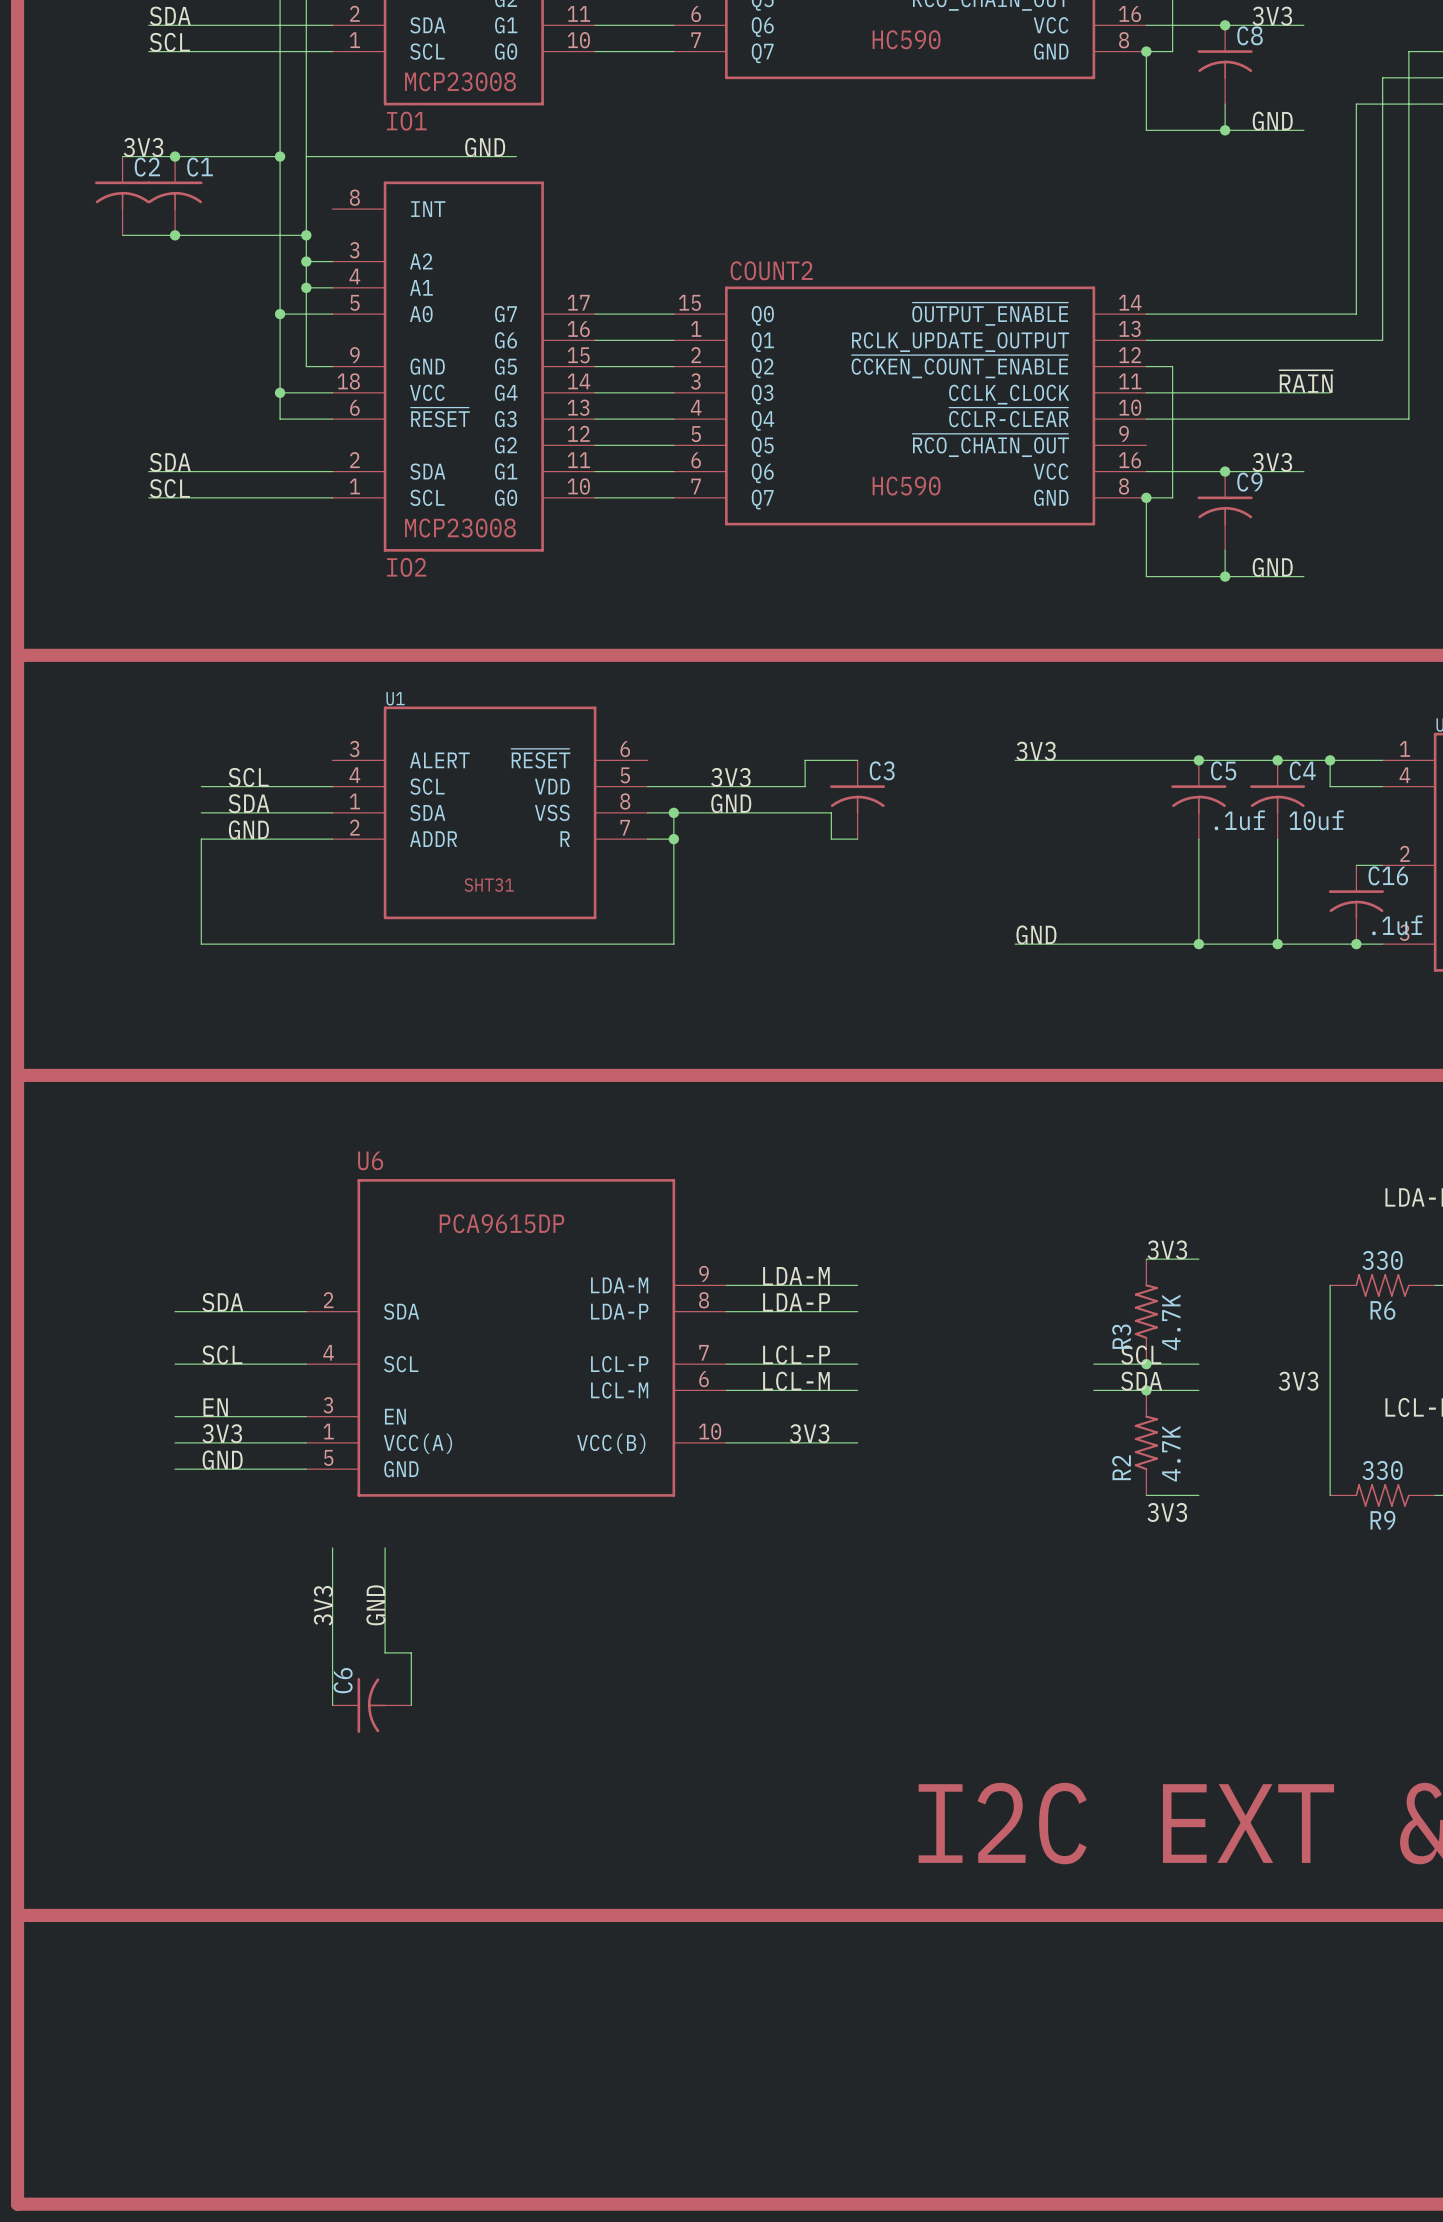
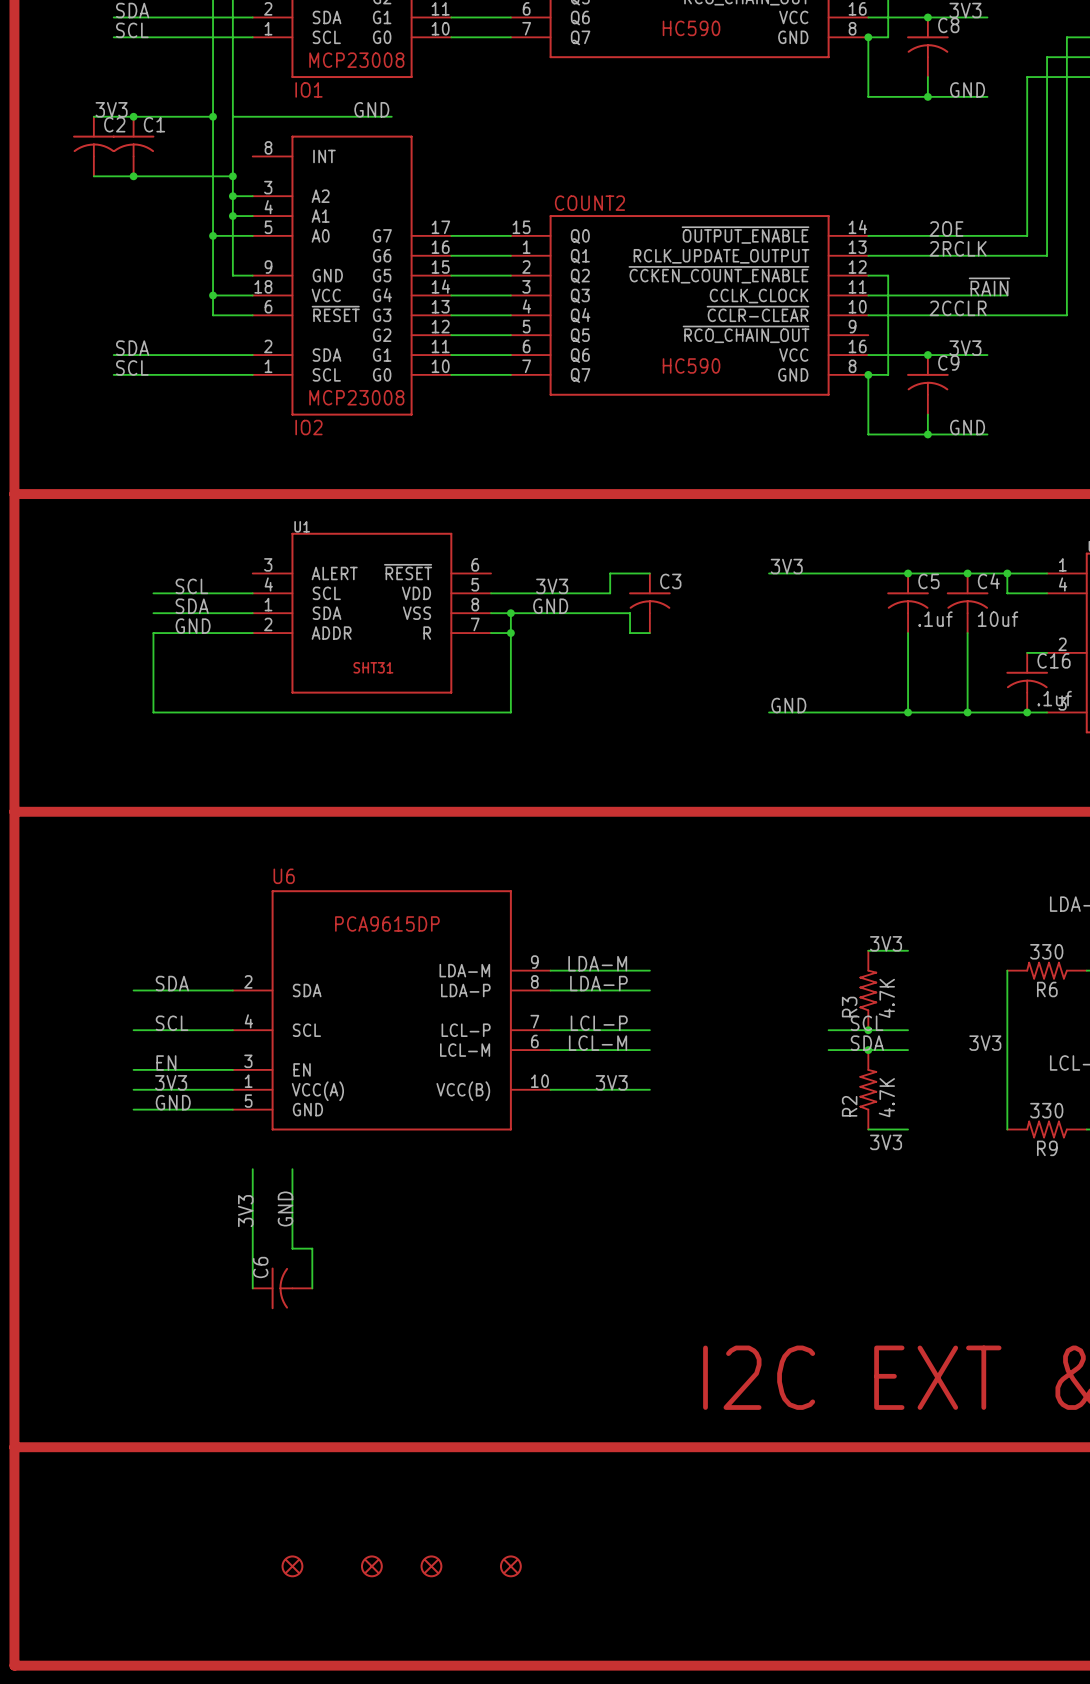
label: none -> 2OE (946, 228)
label: none -> 2RCLK (958, 248)
label: none -> 2CCLR (958, 308)
part: none -> (292, 1566)
part: none -> (371, 1566)
part: none -> (431, 1566)
part: none -> (510, 1566)

